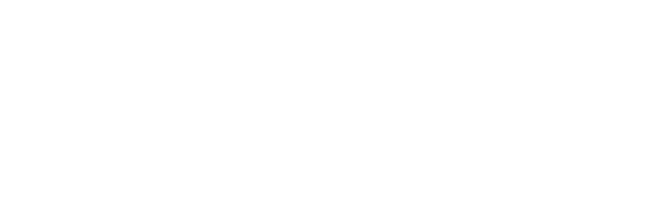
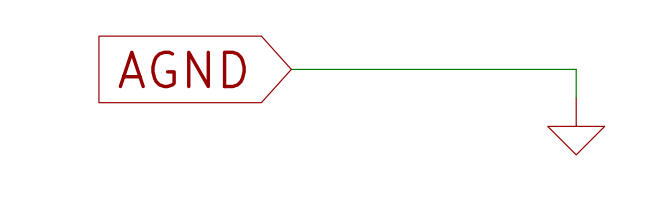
global label: none -> AGND (182, 69)
wire: none -> (291, 69) (576, 69) (576, 97)
power symbol: none -> (576, 126)

